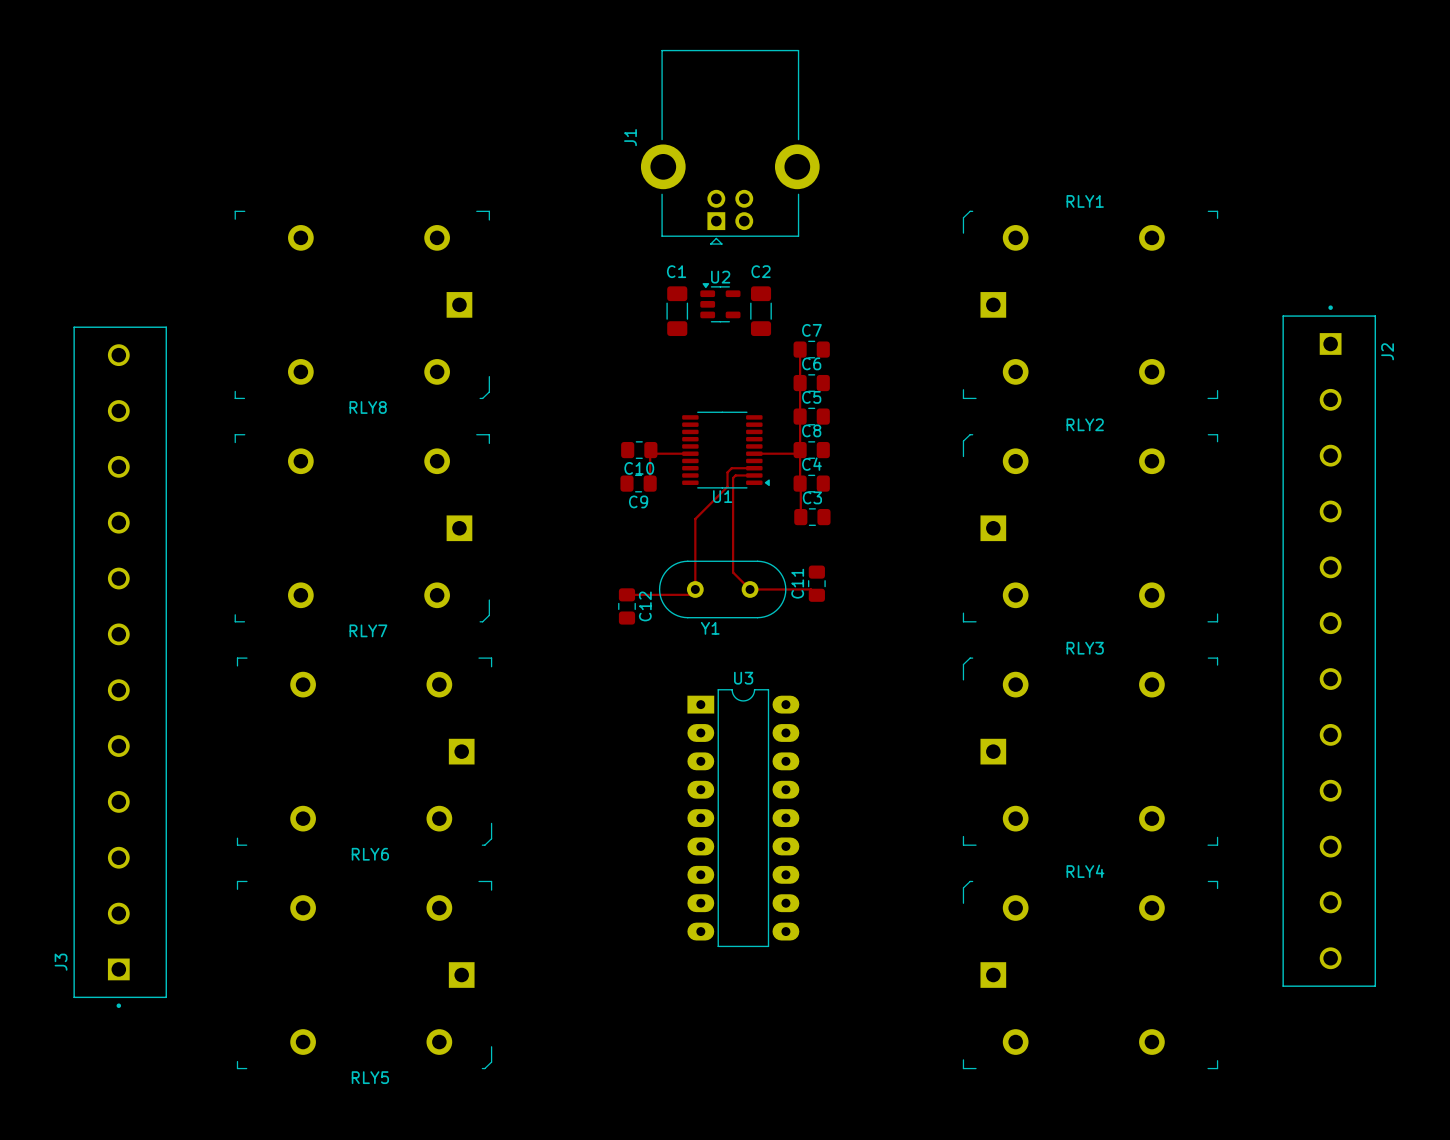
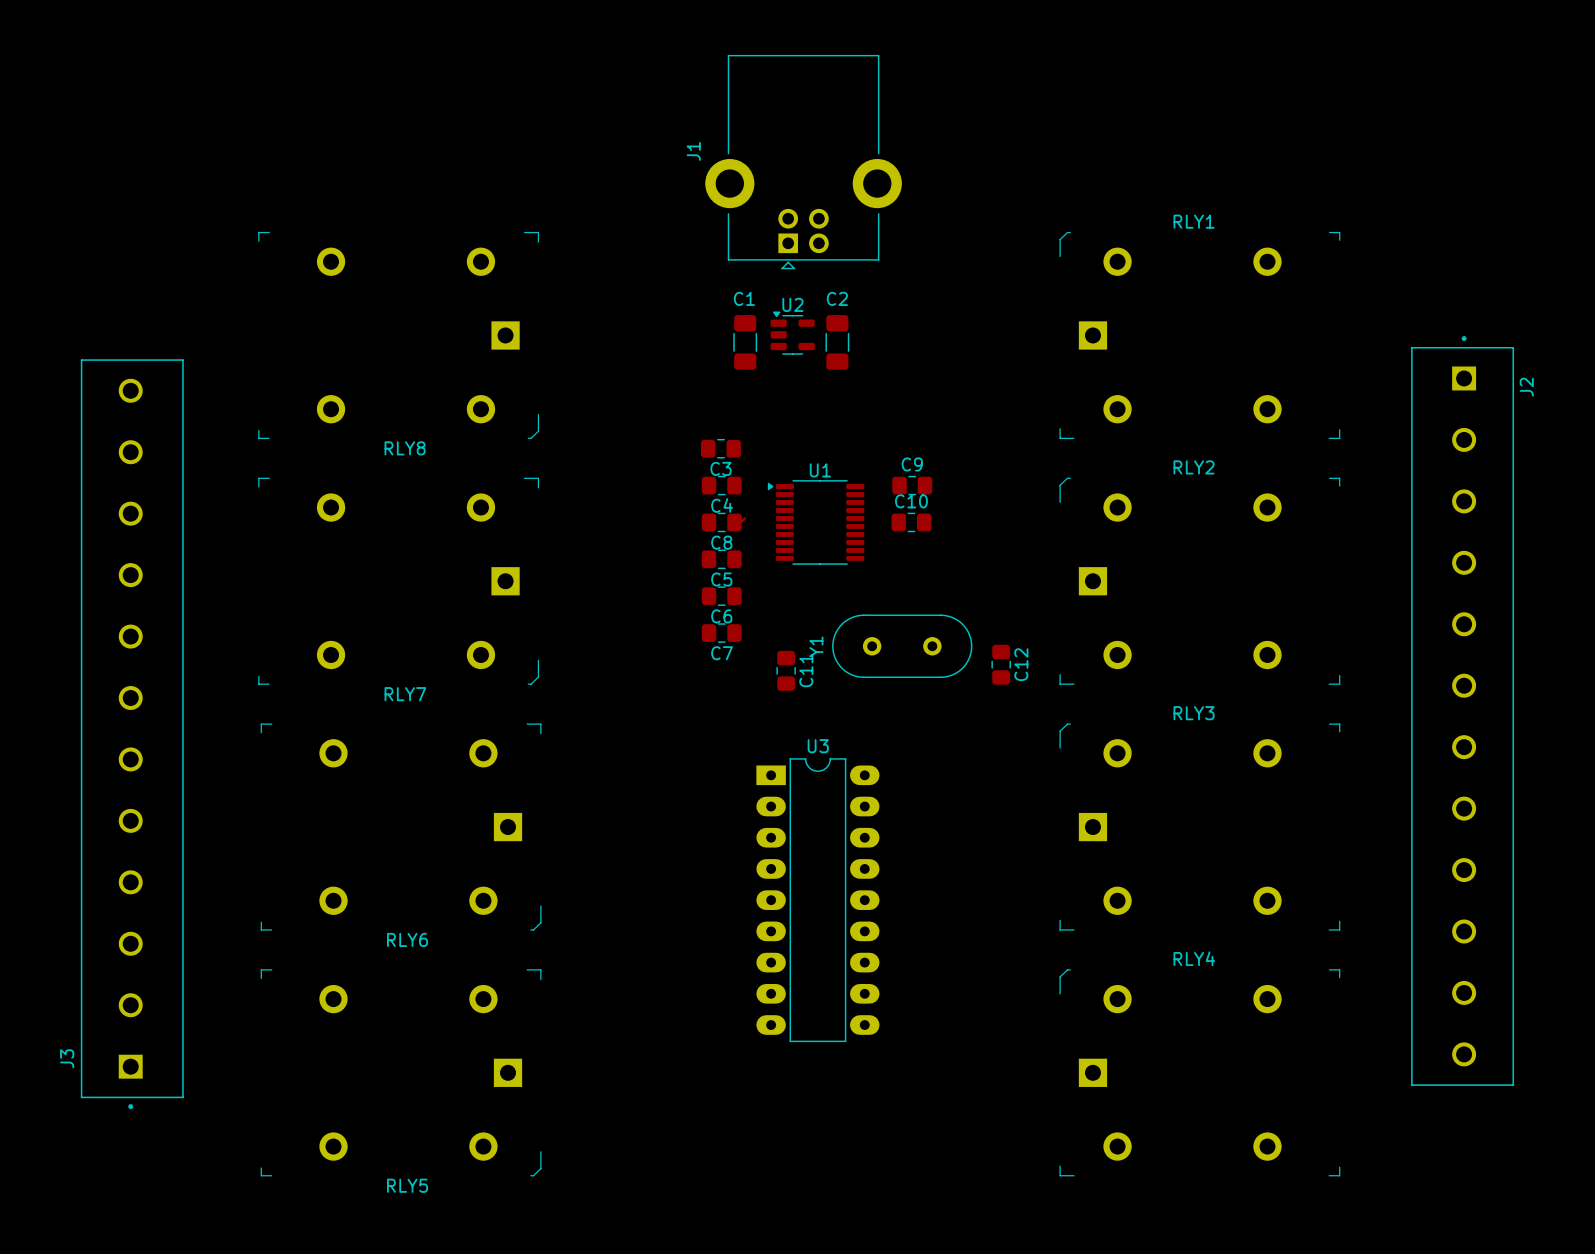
C7 name position: C7 (811, 330) -> C7 (722, 653)
top track: (800, 349) (800, 517) -> none
C7 position: (811, 349) -> (721, 633)
C6 name position: C6 (811, 363) -> C6 (721, 616)
C6 position: (811, 383) -> (721, 596)
C5 name position: C5 (811, 397) -> C5 (721, 579)
C5 position: (811, 416) -> (721, 559)
C8 name position: C8 (811, 430) -> C8 (721, 542)
C10 position: (639, 450) -> (911, 522)
U1 rotation: 0° (725, 450) -> 180° (816, 522)
top track: (800, 450) (796, 453) (754, 453) -> none
C8 position: (811, 450) -> (721, 522)
top track: (690, 453) (654, 453) (650, 450) (650, 483) -> none
C4 name position: C4 (811, 464) -> C4 (722, 505)
C10 name position: C10 (639, 468) -> C10 (911, 501)
top track: (754, 468) (731, 468) (727, 472) (727, 486) (695, 518) (695, 589) (689, 594) (626, 594) -> none
top track: none -> (744, 518) (740, 522)
top track: (754, 475) (735, 475) (733, 478) (733, 572) (750, 589) (811, 589) (816, 595) -> none
C9 position: (638, 483) -> (912, 485)
C4 position: (811, 483) -> (721, 485)
C3 name position: C3 (812, 497) -> C3 (720, 468)
C9 name position: C9 (638, 501) -> C9 (912, 464)
C3 position: (812, 517) -> (720, 448)
C11 name position: C11 (797, 583) -> C11 (806, 670)
C11 position: (816, 583) -> (786, 670)
Y1 position: (722, 589) -> (902, 646)
C12 position: (626, 606) -> (1001, 664)
Y1 name rotation: 0° (710, 628) -> 90° counterclockwise (816, 646)
Y1 name position: Y1 (710, 628) -> Y1 (816, 646)

